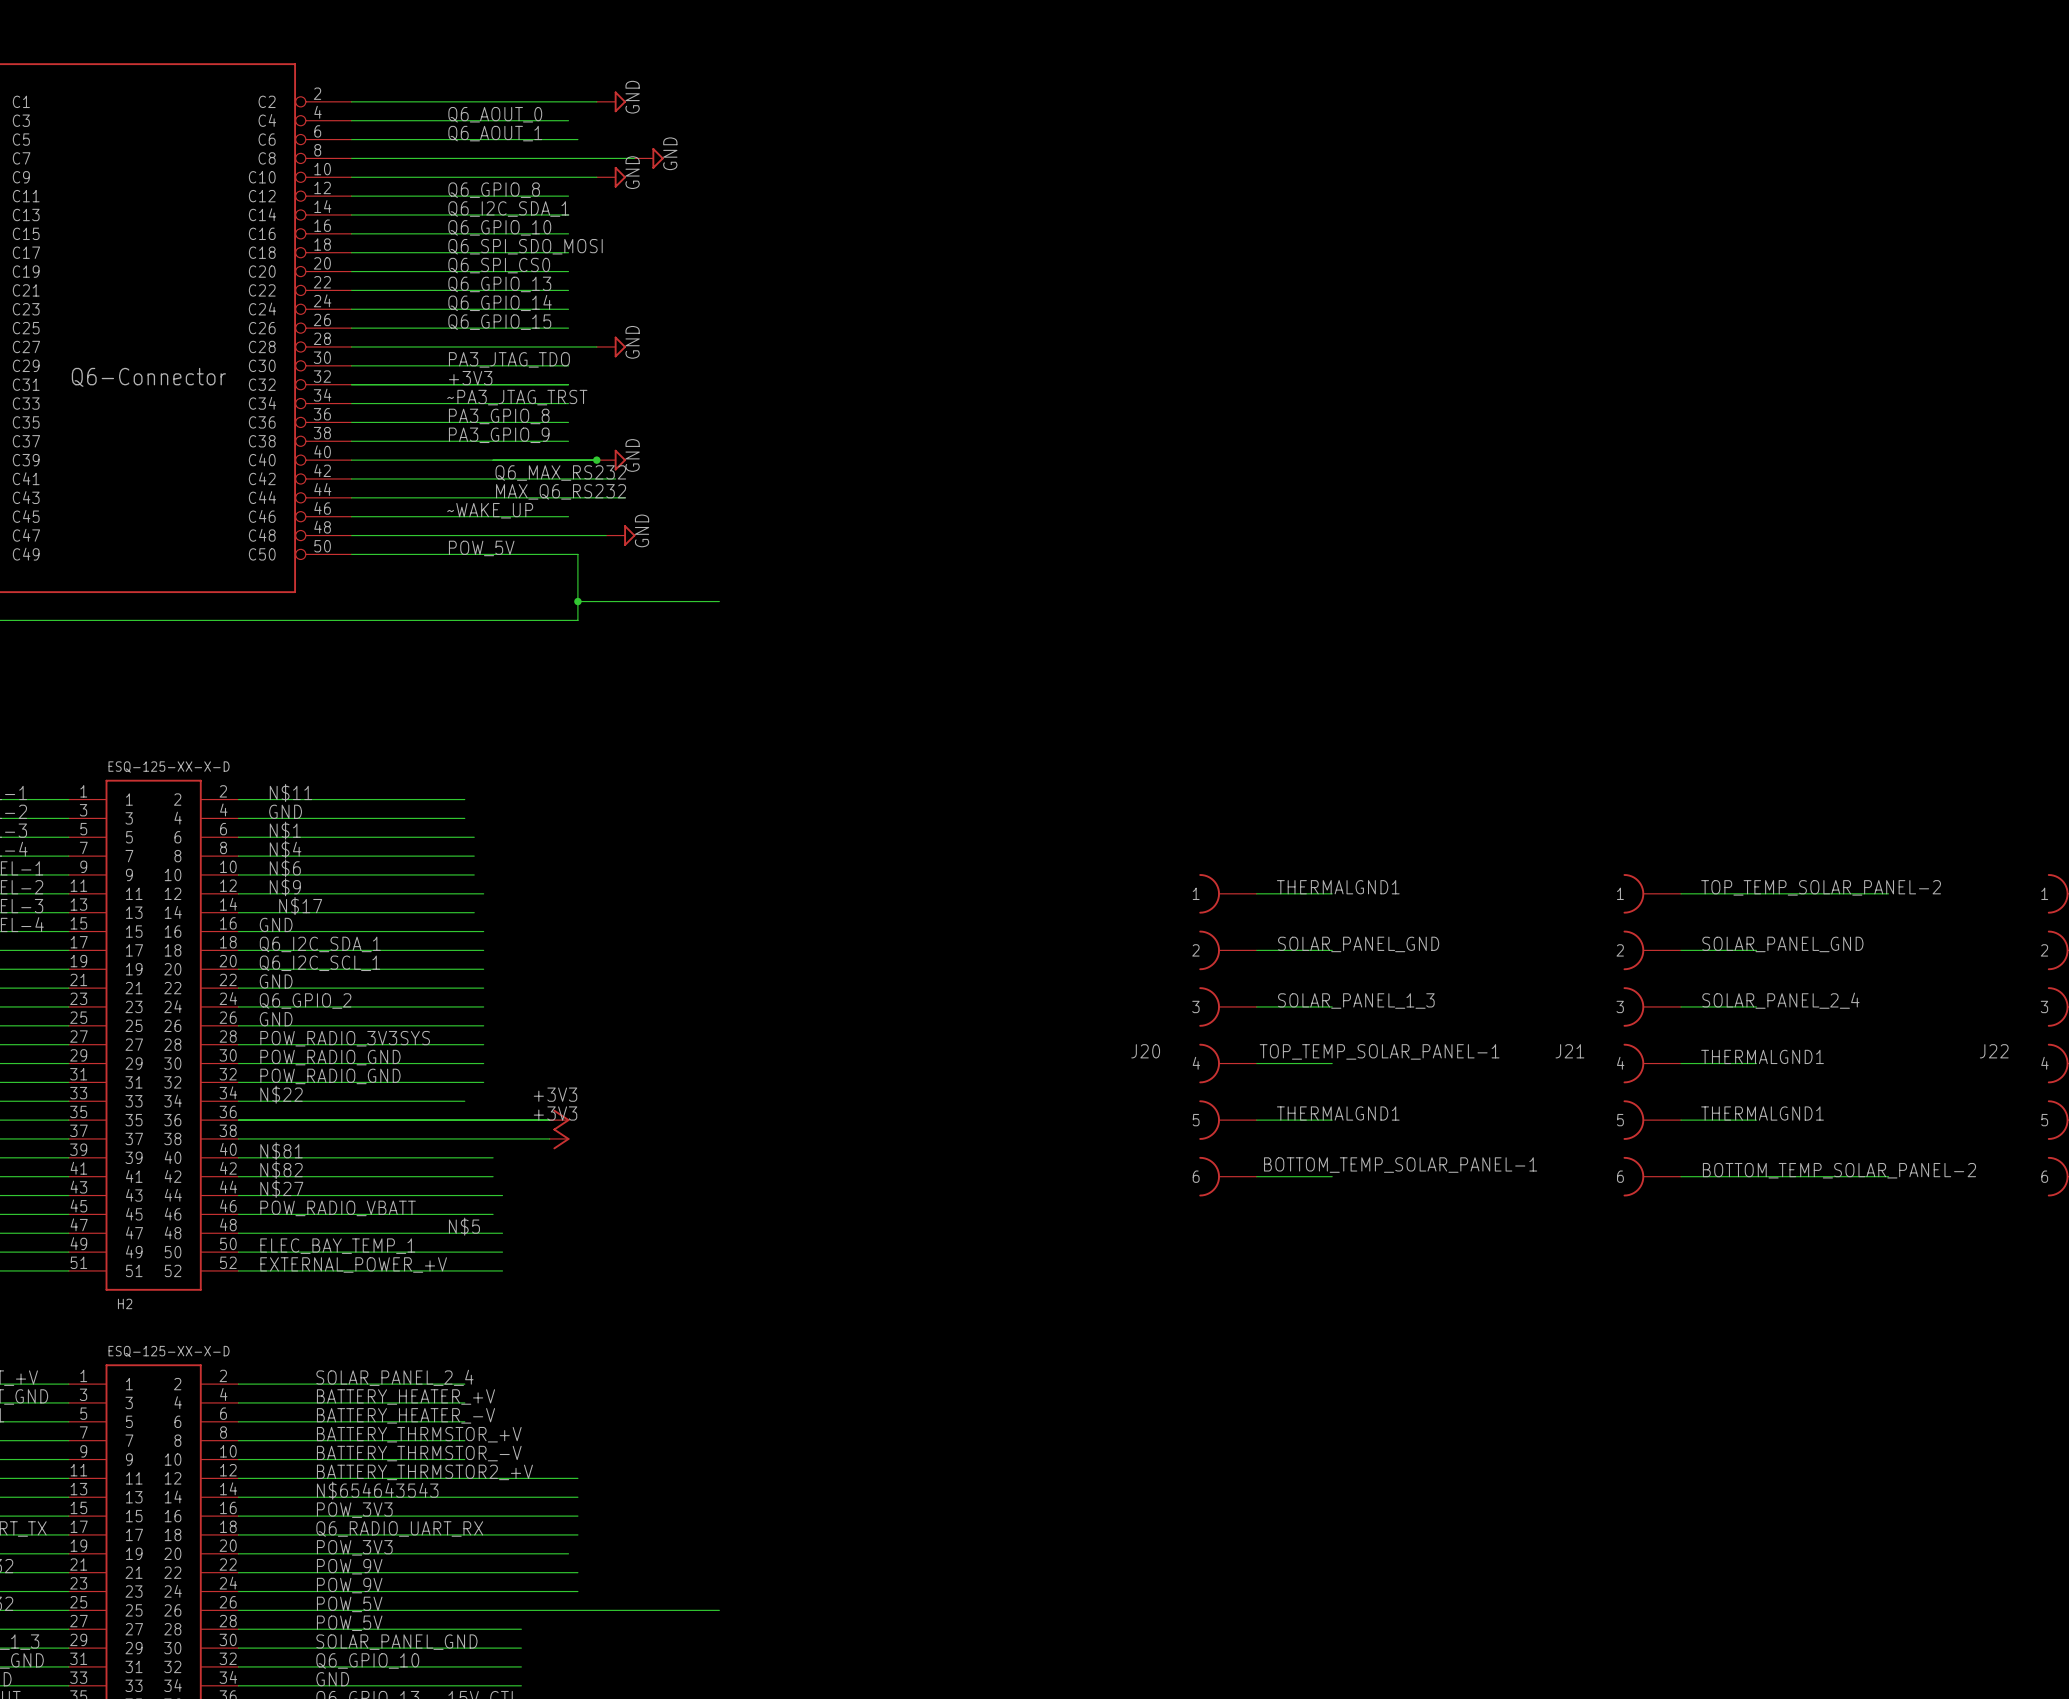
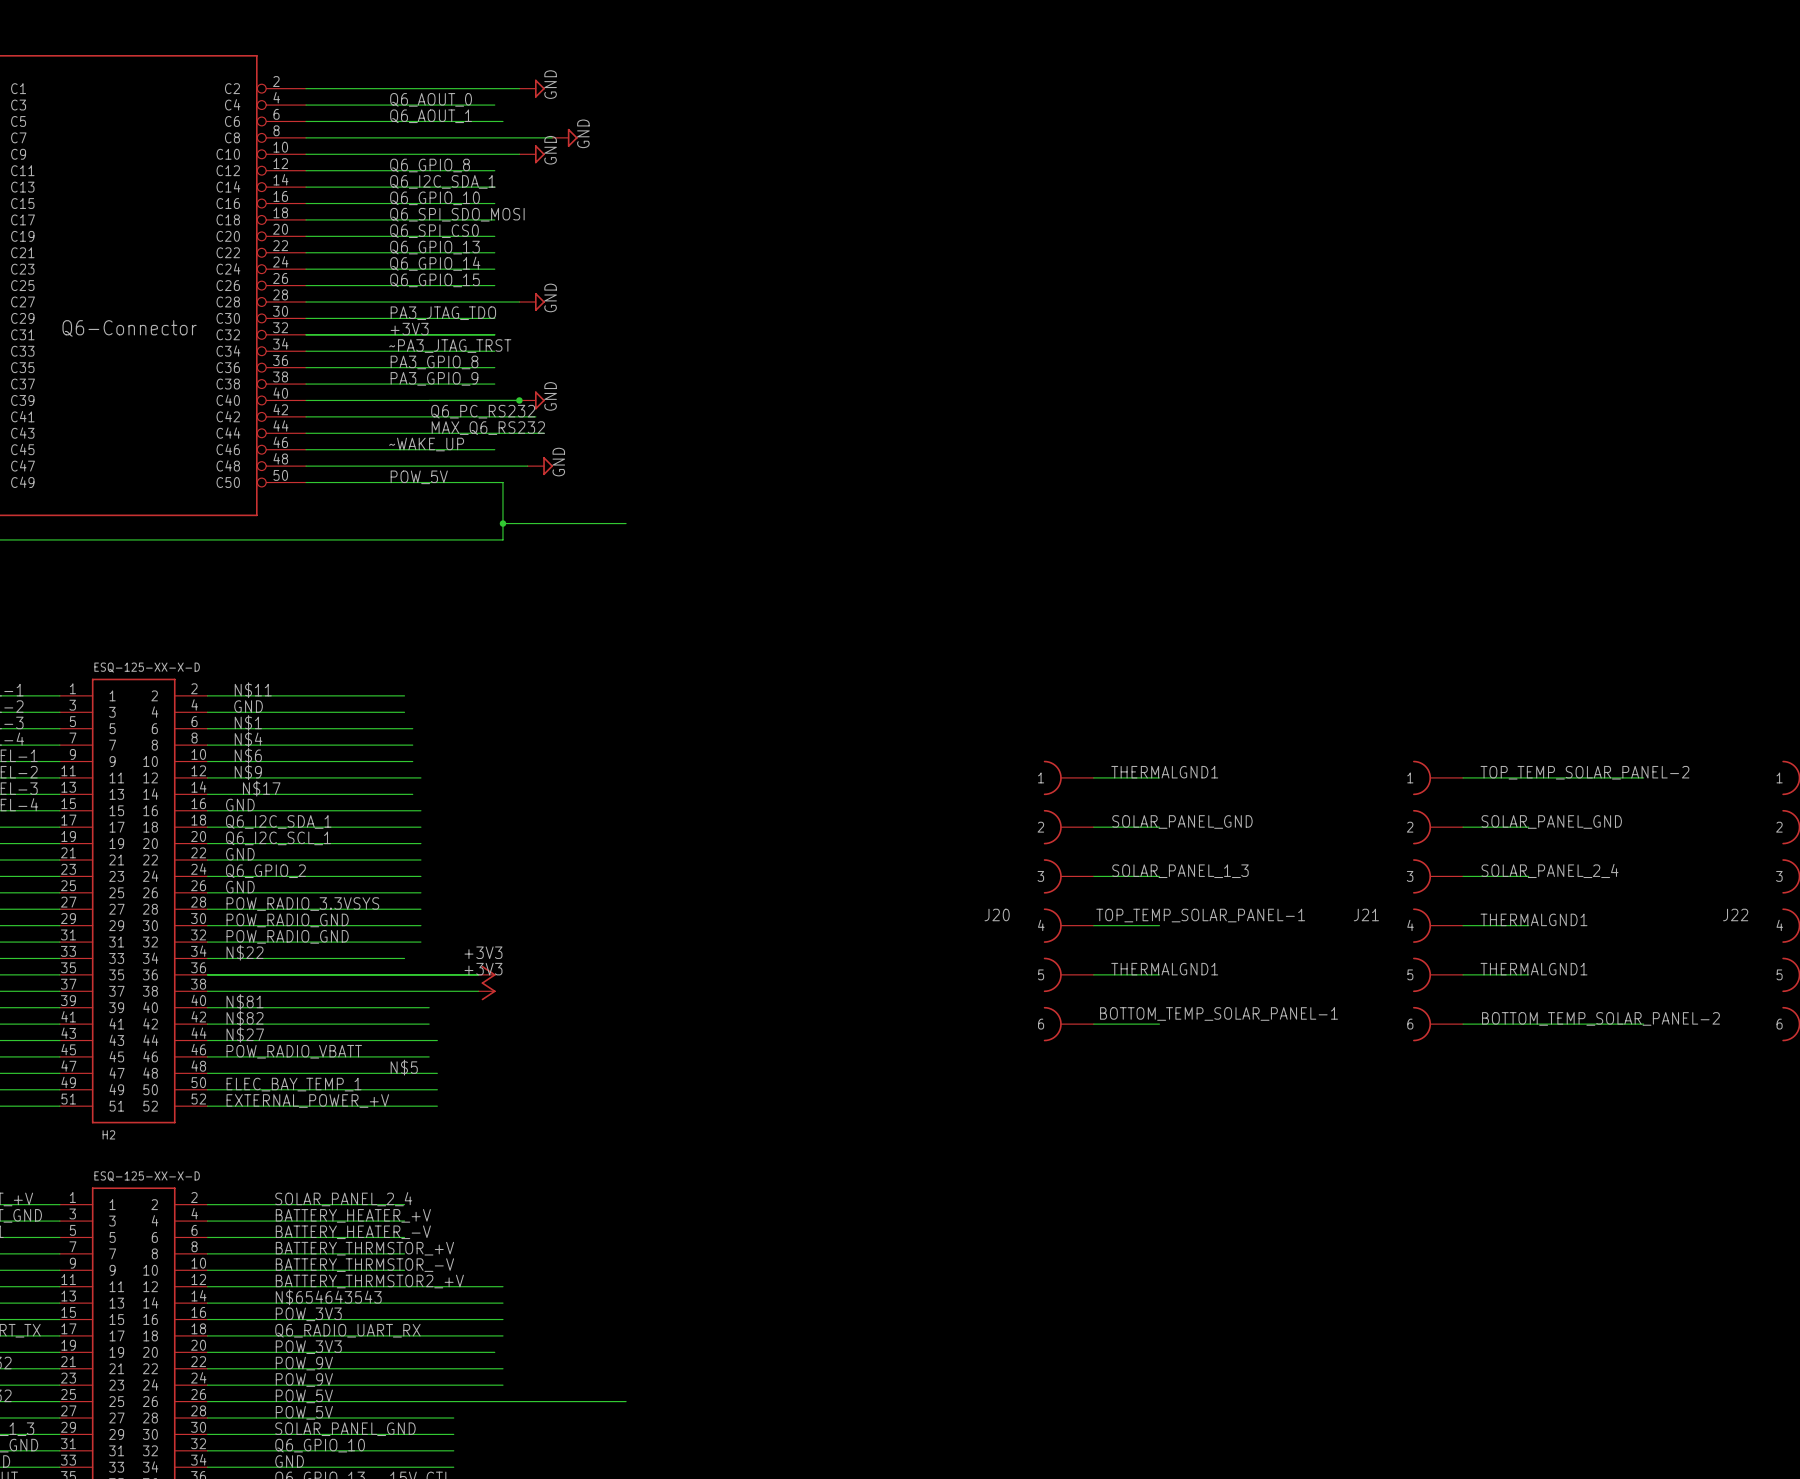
label: Q6_MAX_RS232 (560, 473) -> Q6_PC_RS232 (483, 411)
label: POW_RADIO_3V3SYS (345, 1038) -> POW_RADIO_3.3VSYS (302, 904)

